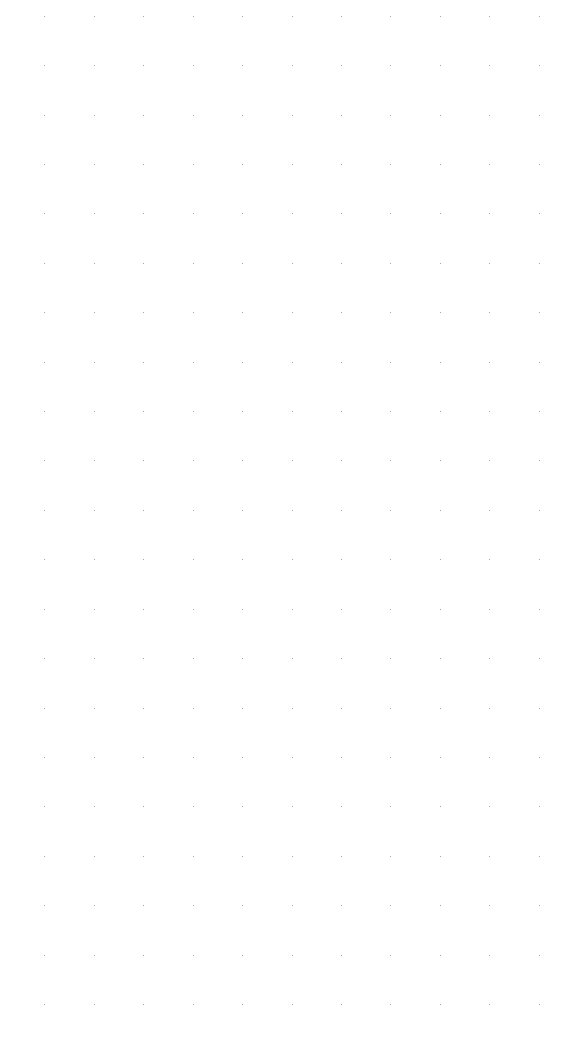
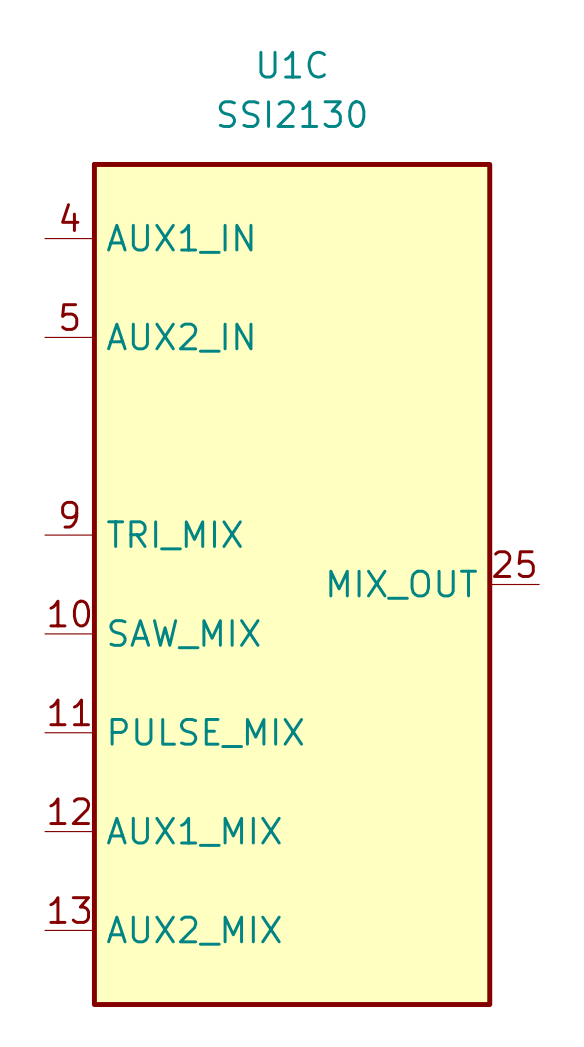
U1C: none -> SSI2130 (292, 584)

